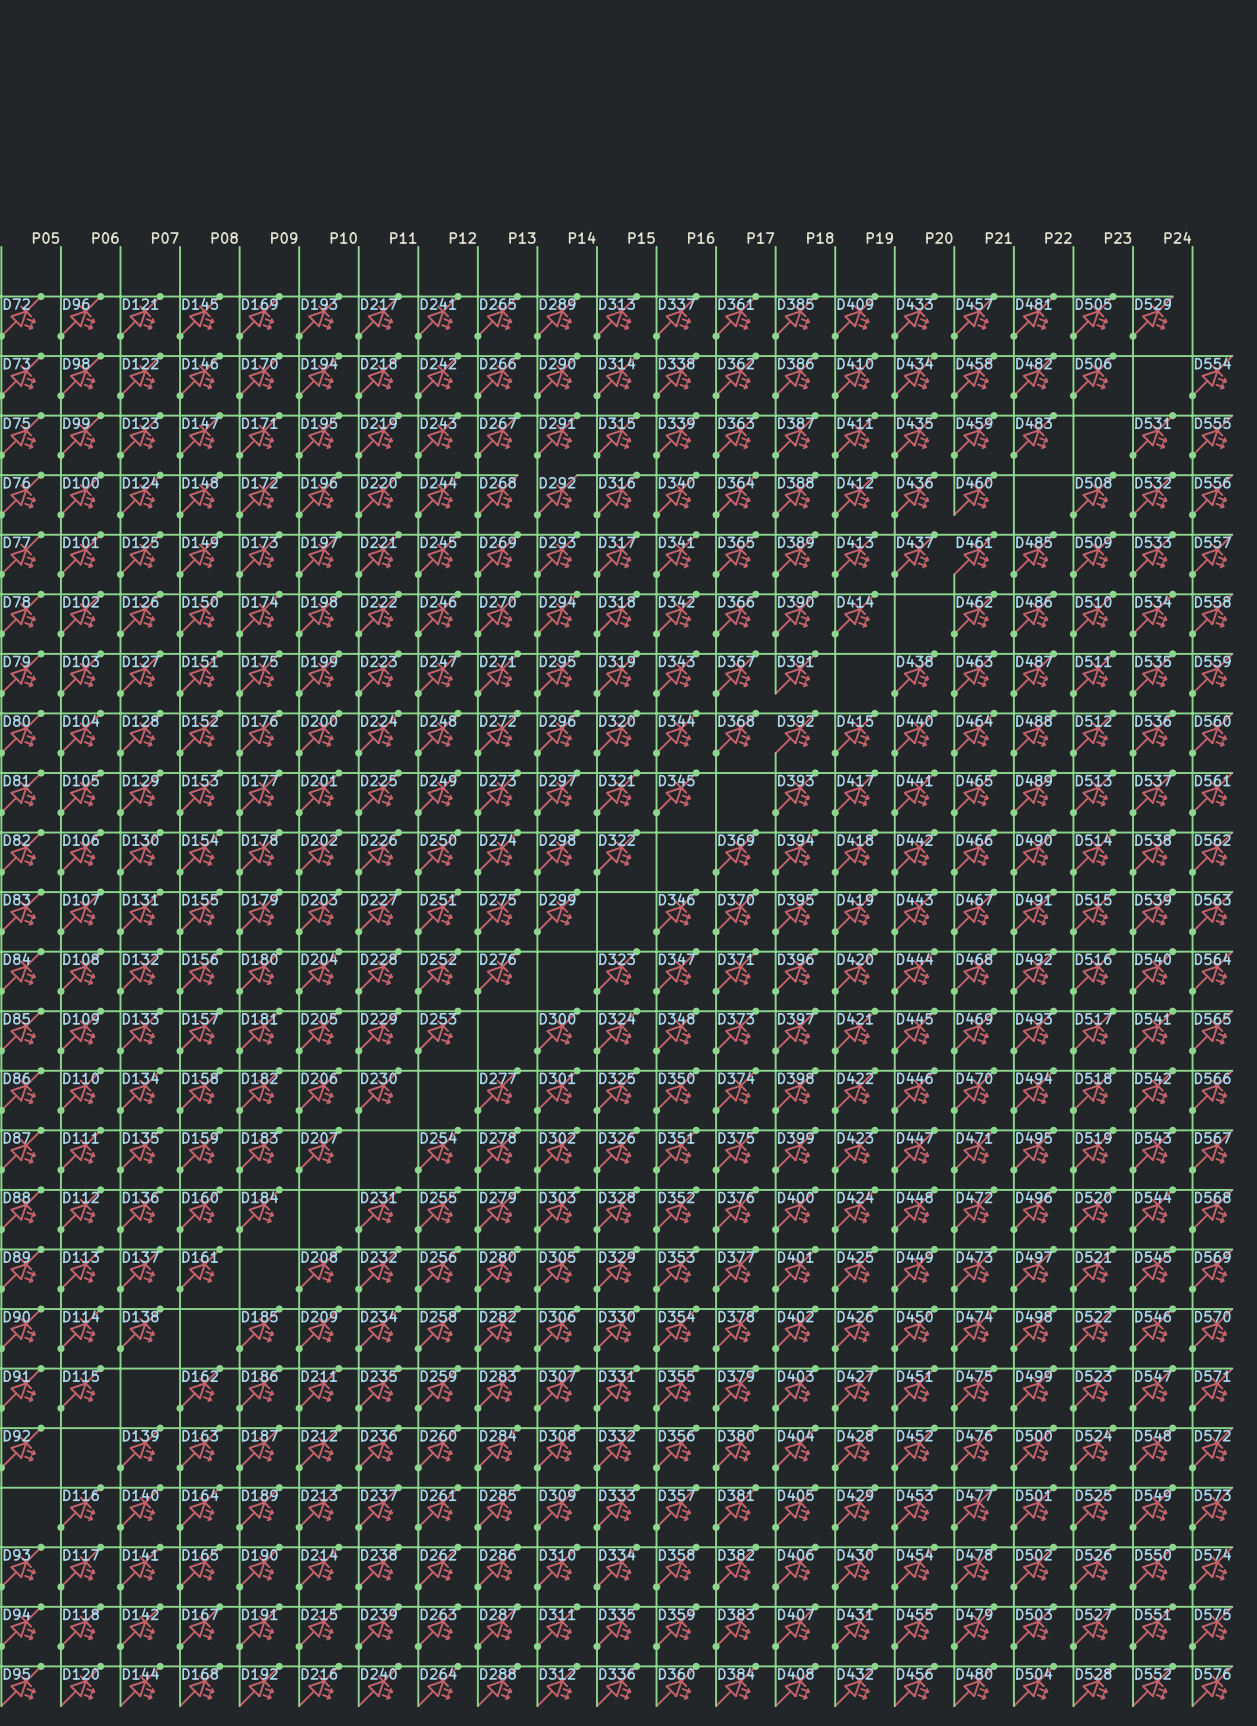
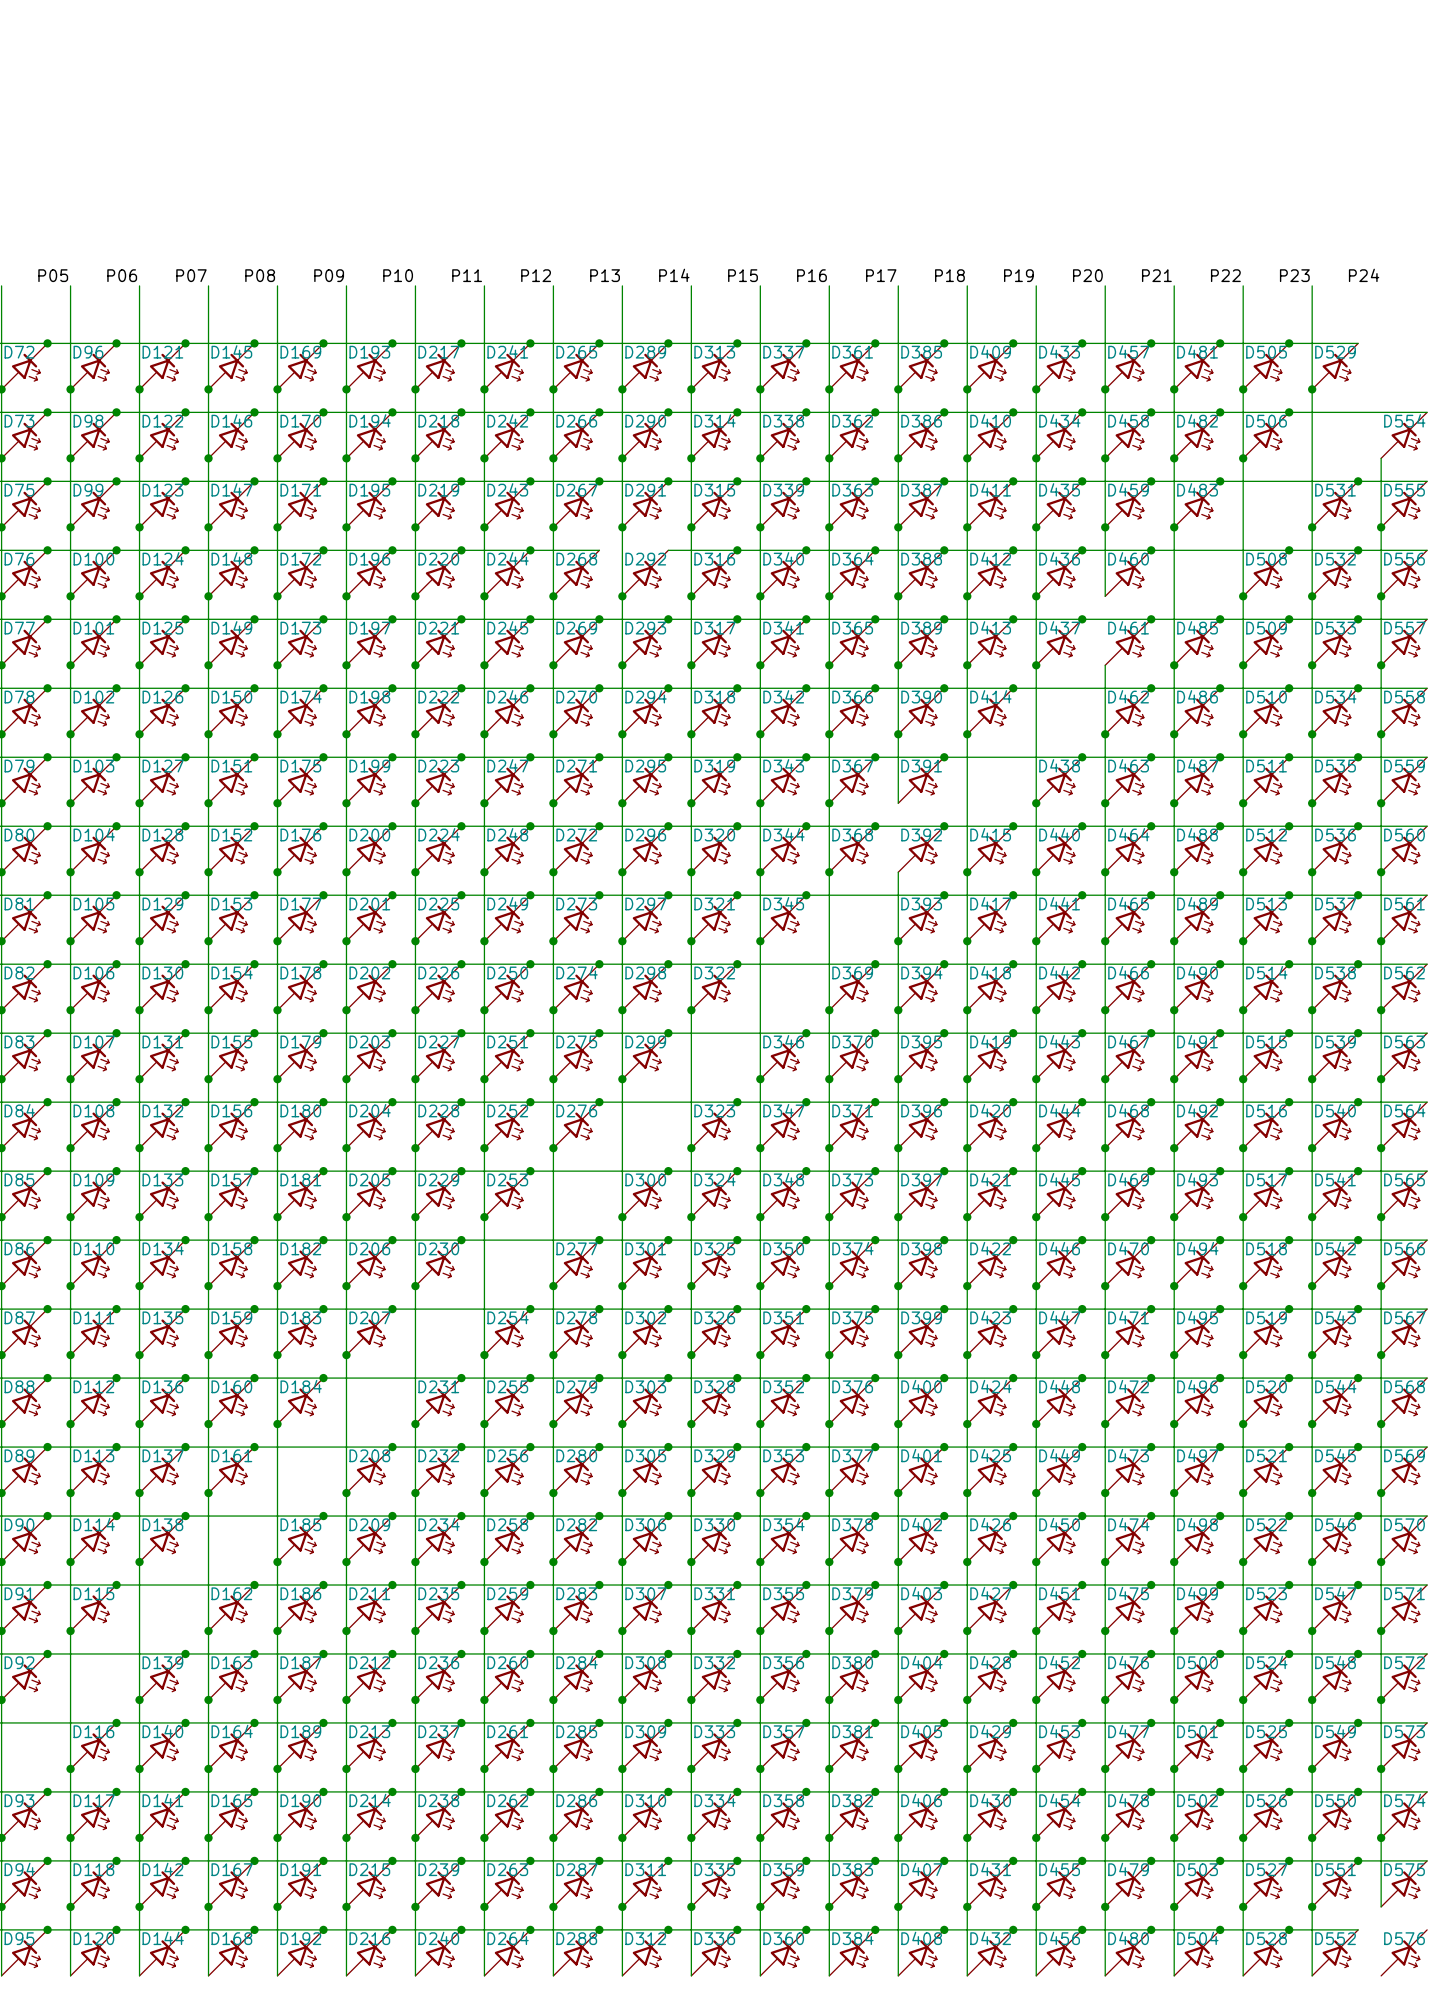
wire: (1192, 246) (1192, 395) -> none
junction: (1192, 395) -> none
wire: (1192, 1646) (1192, 1706) -> none
junction: (1192, 1646) -> none
wire: (1172, 1666) (1232, 1666) -> none
junction: (1172, 1666) -> none

